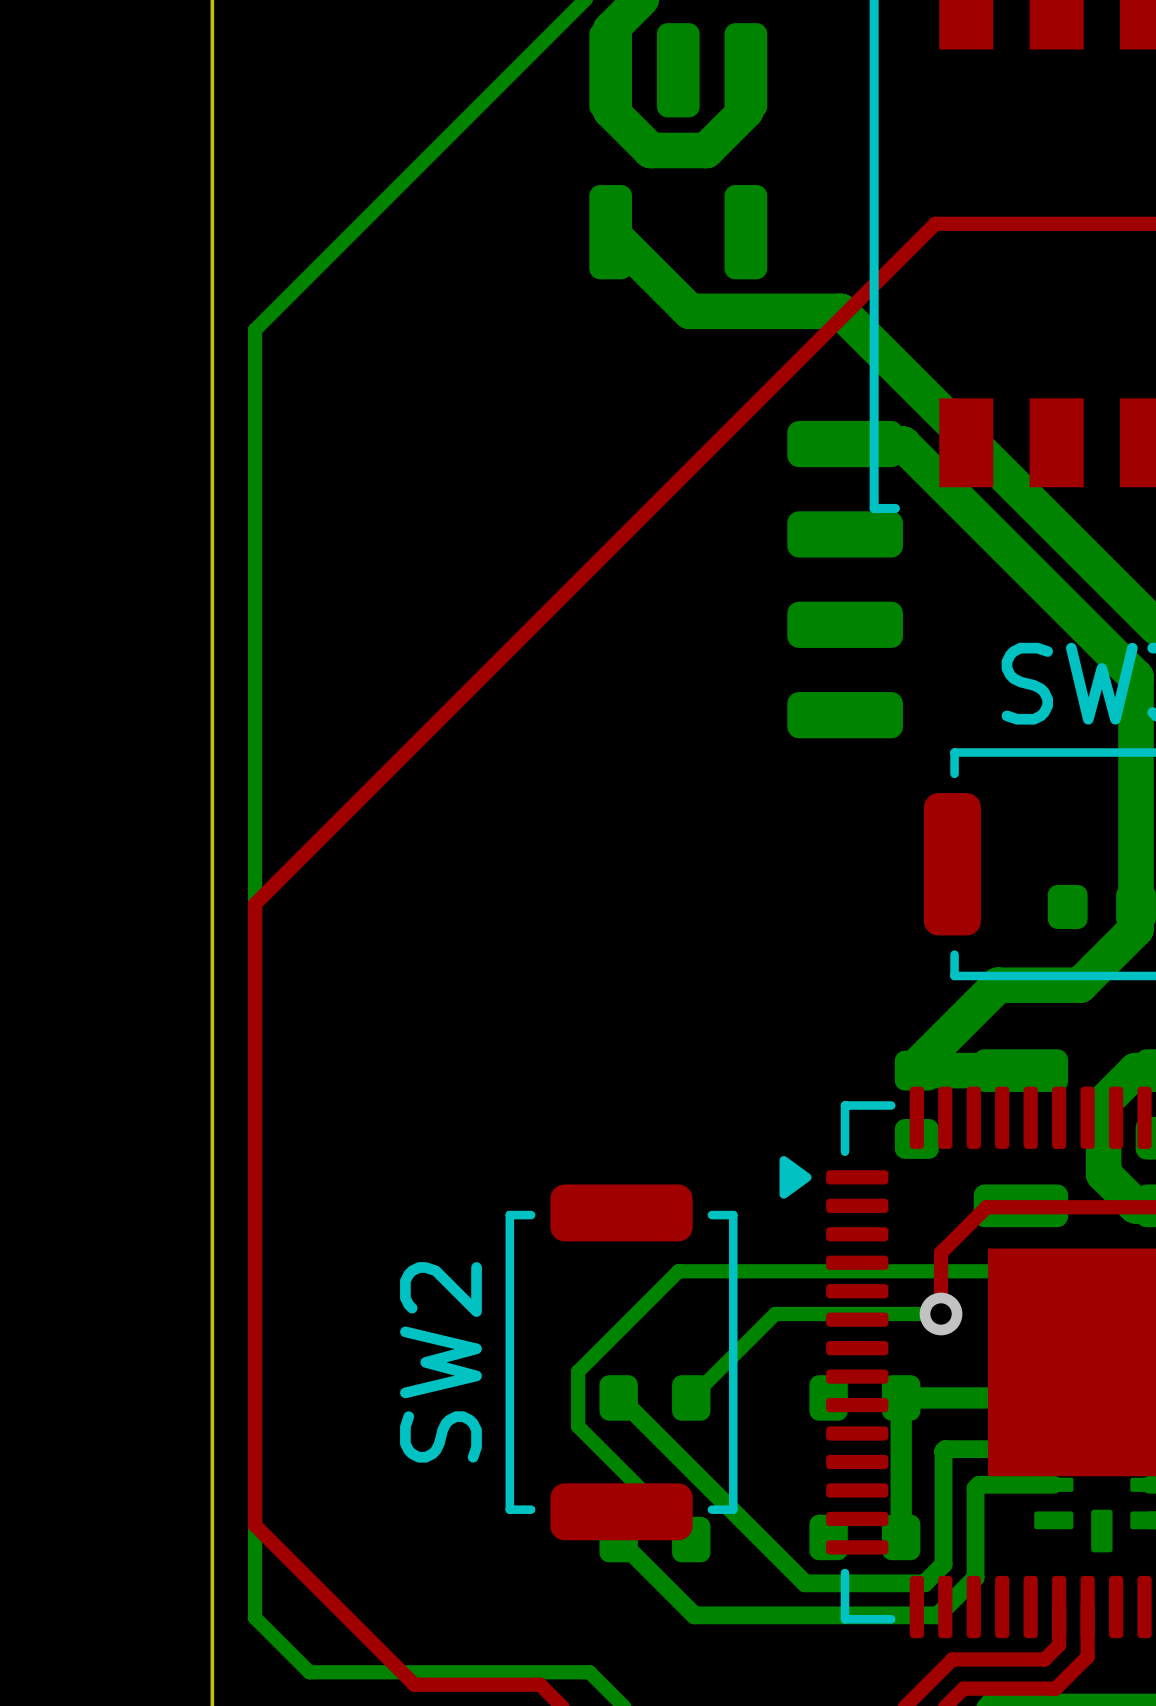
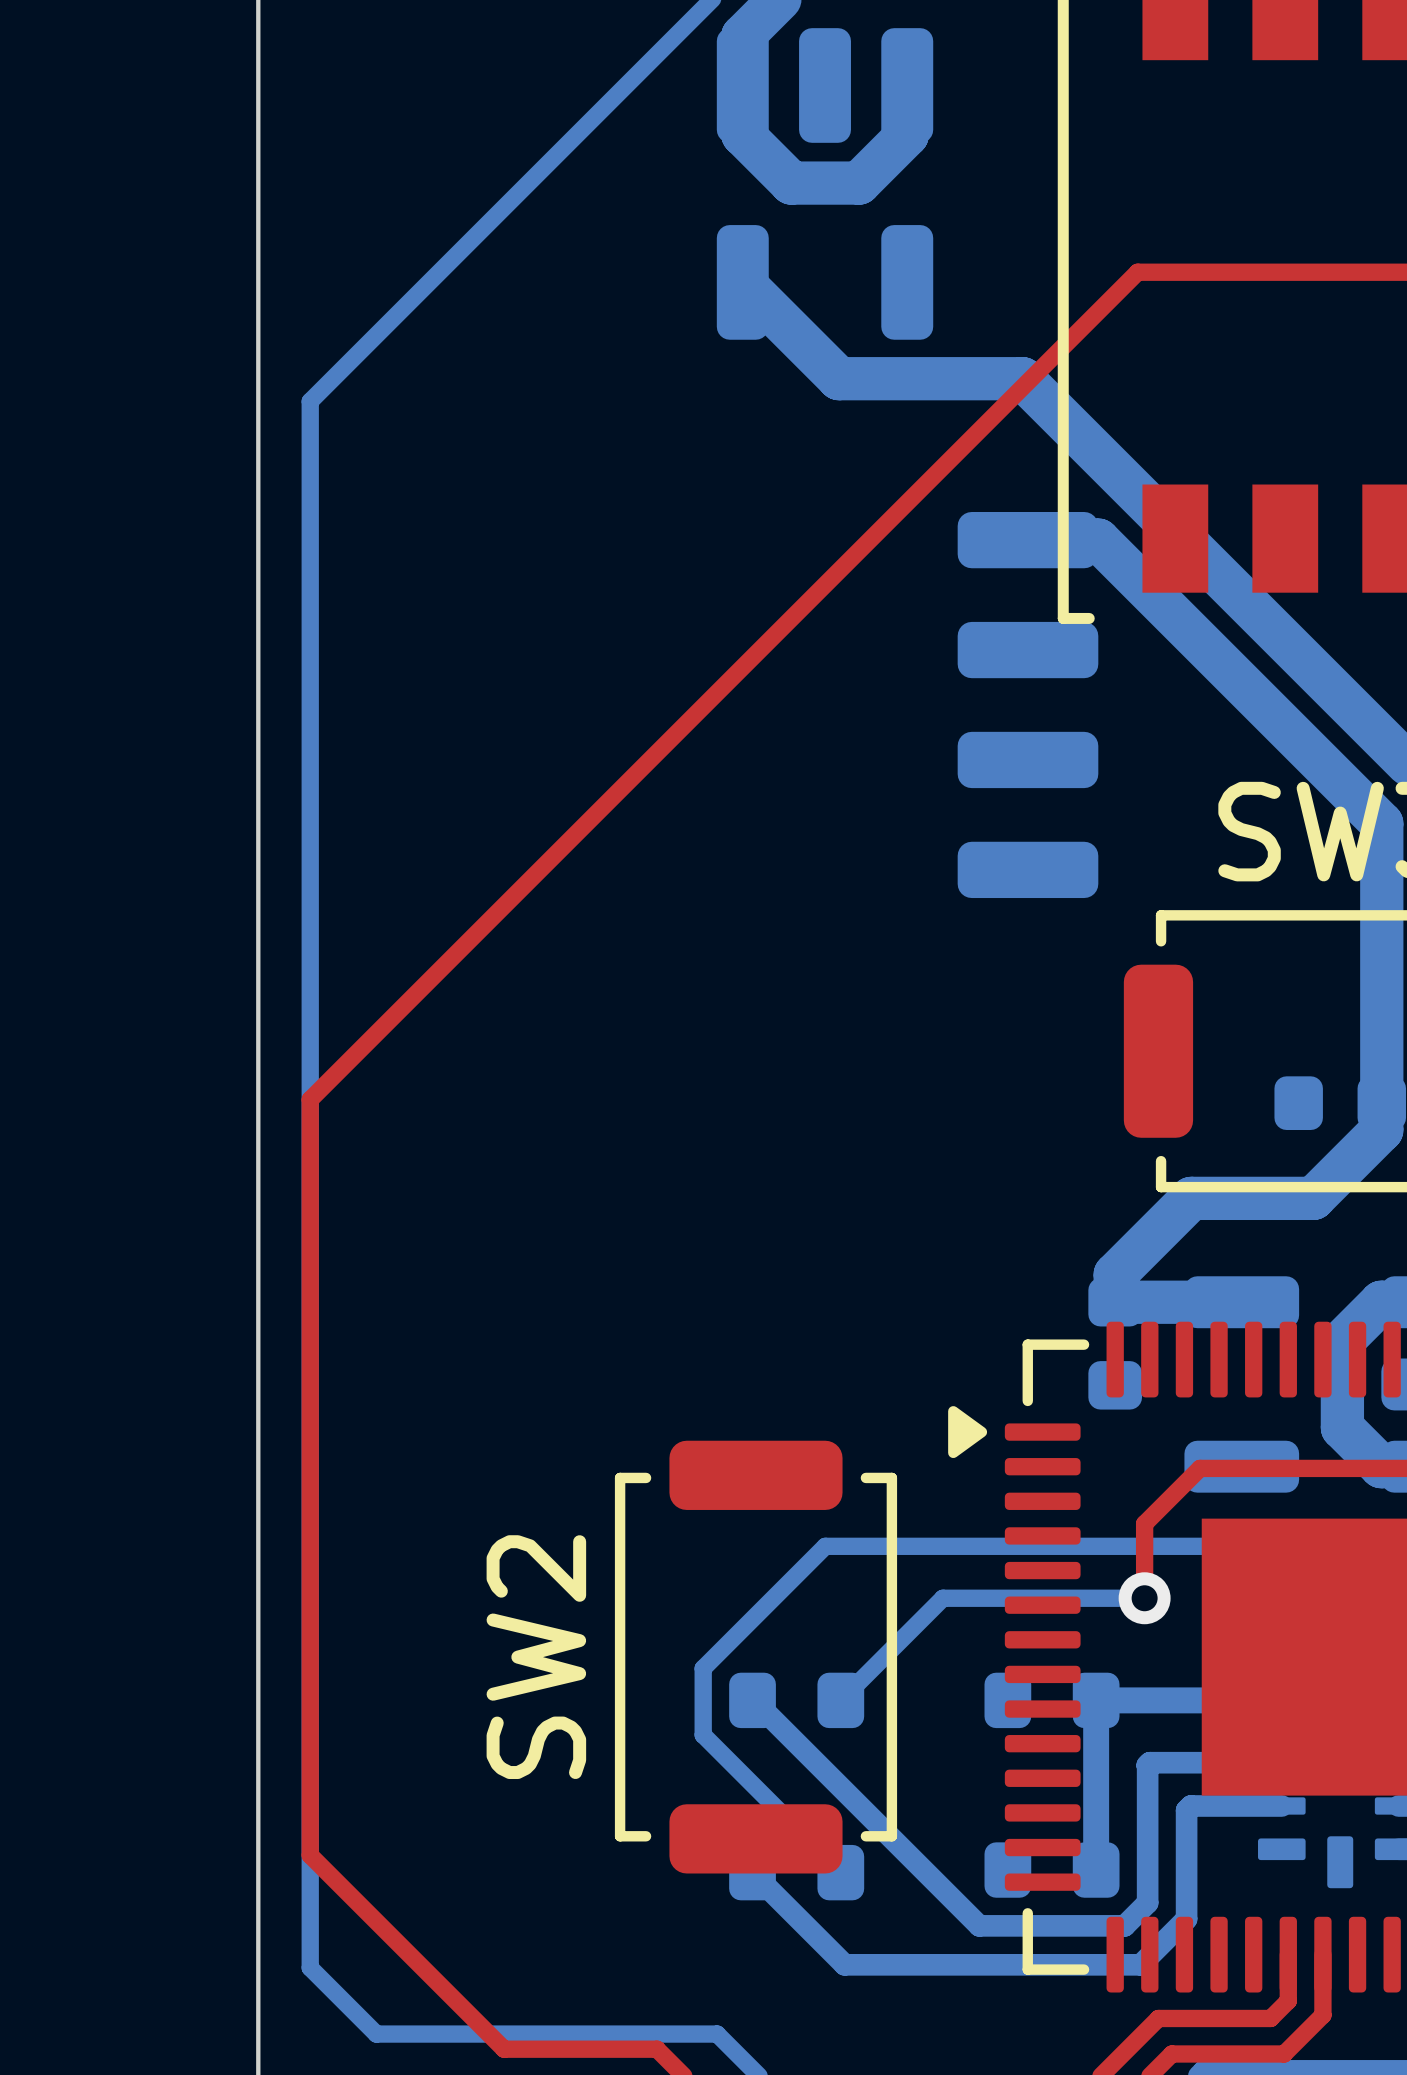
bottom track: (997, 985) (916, 1066) -> (1213, 1198) (1191, 1198) (1115, 1274) (1115, 1297)

